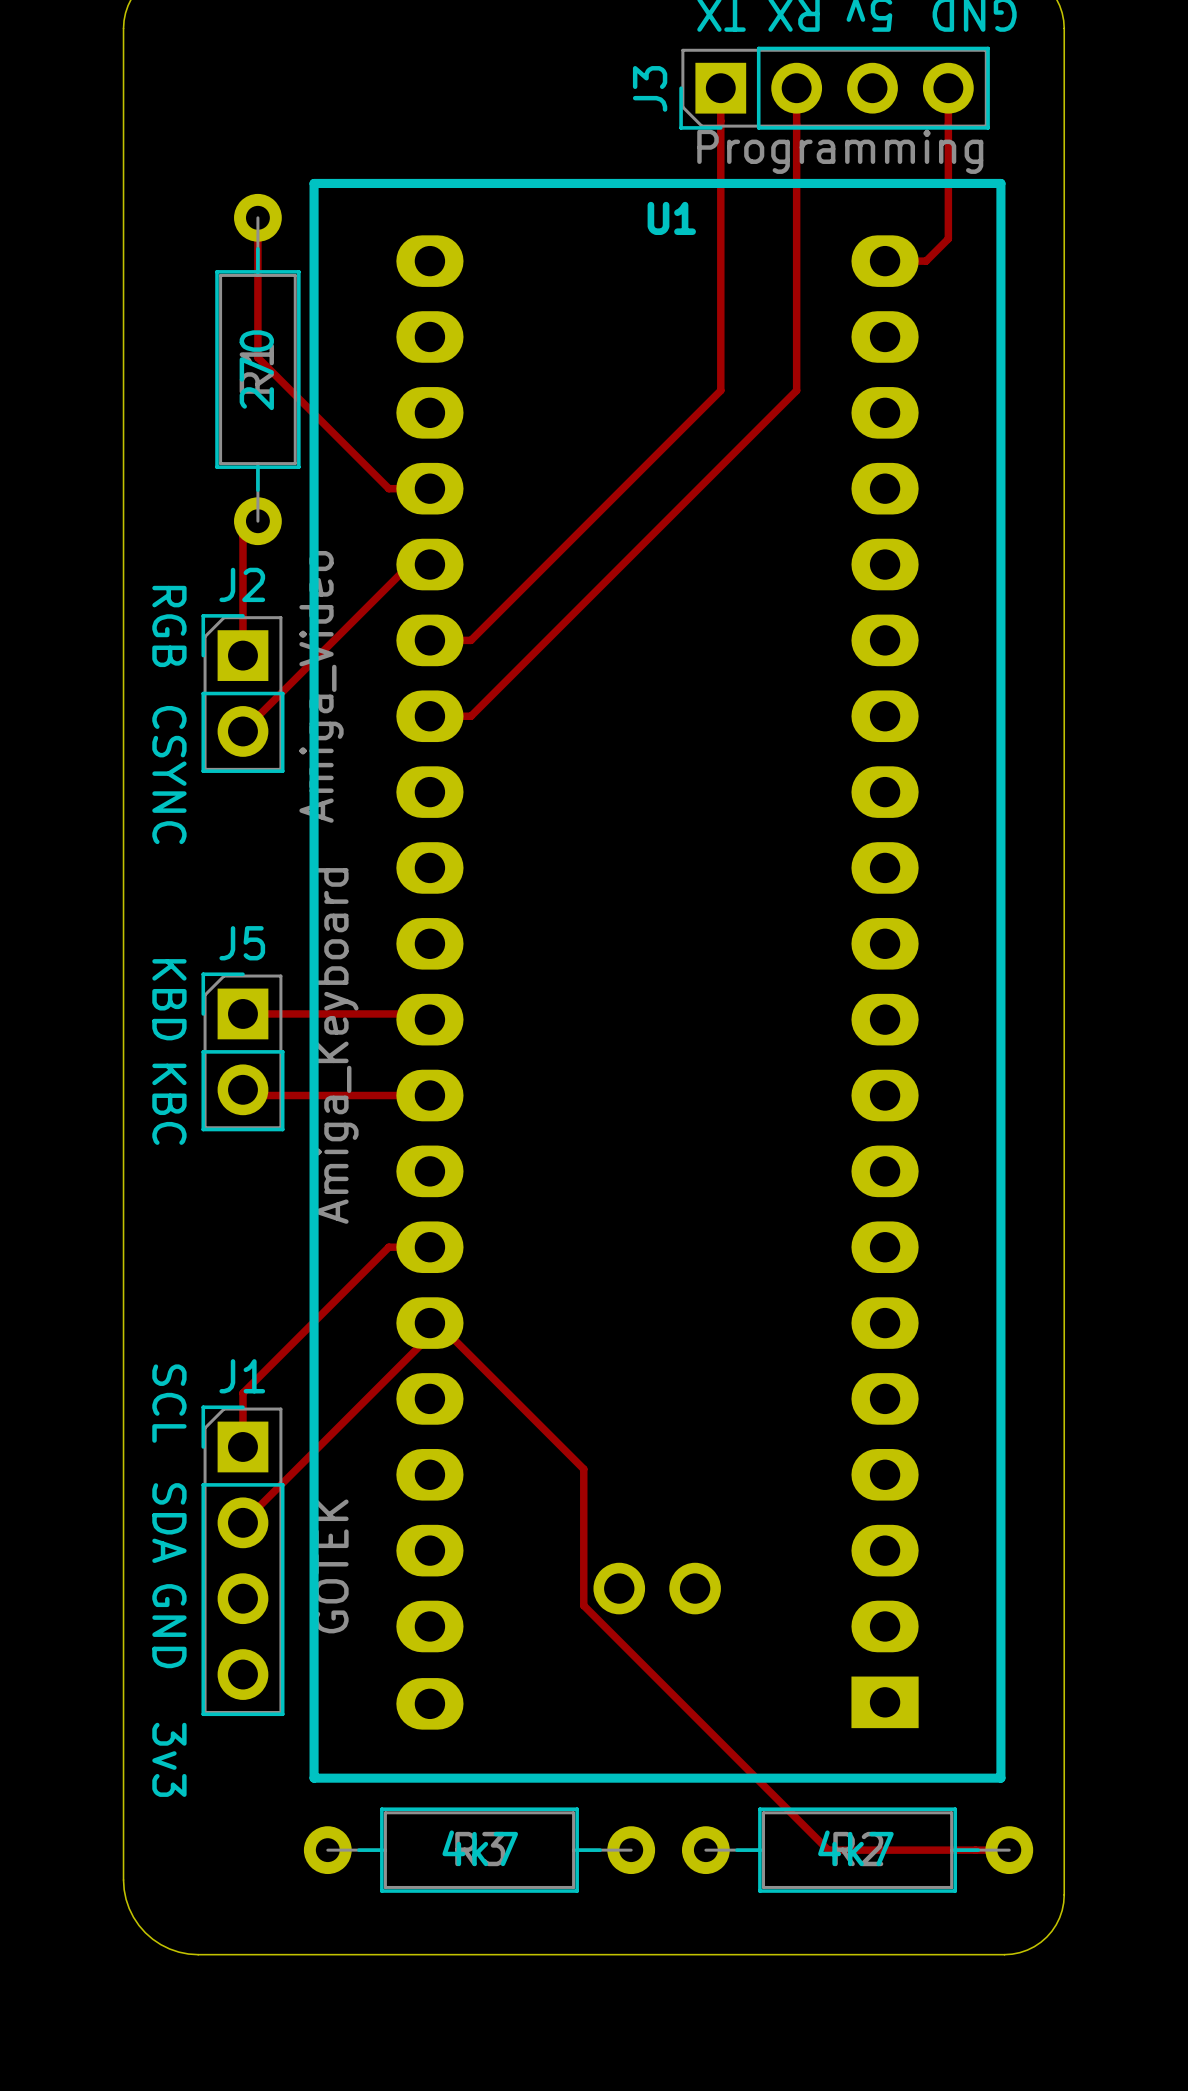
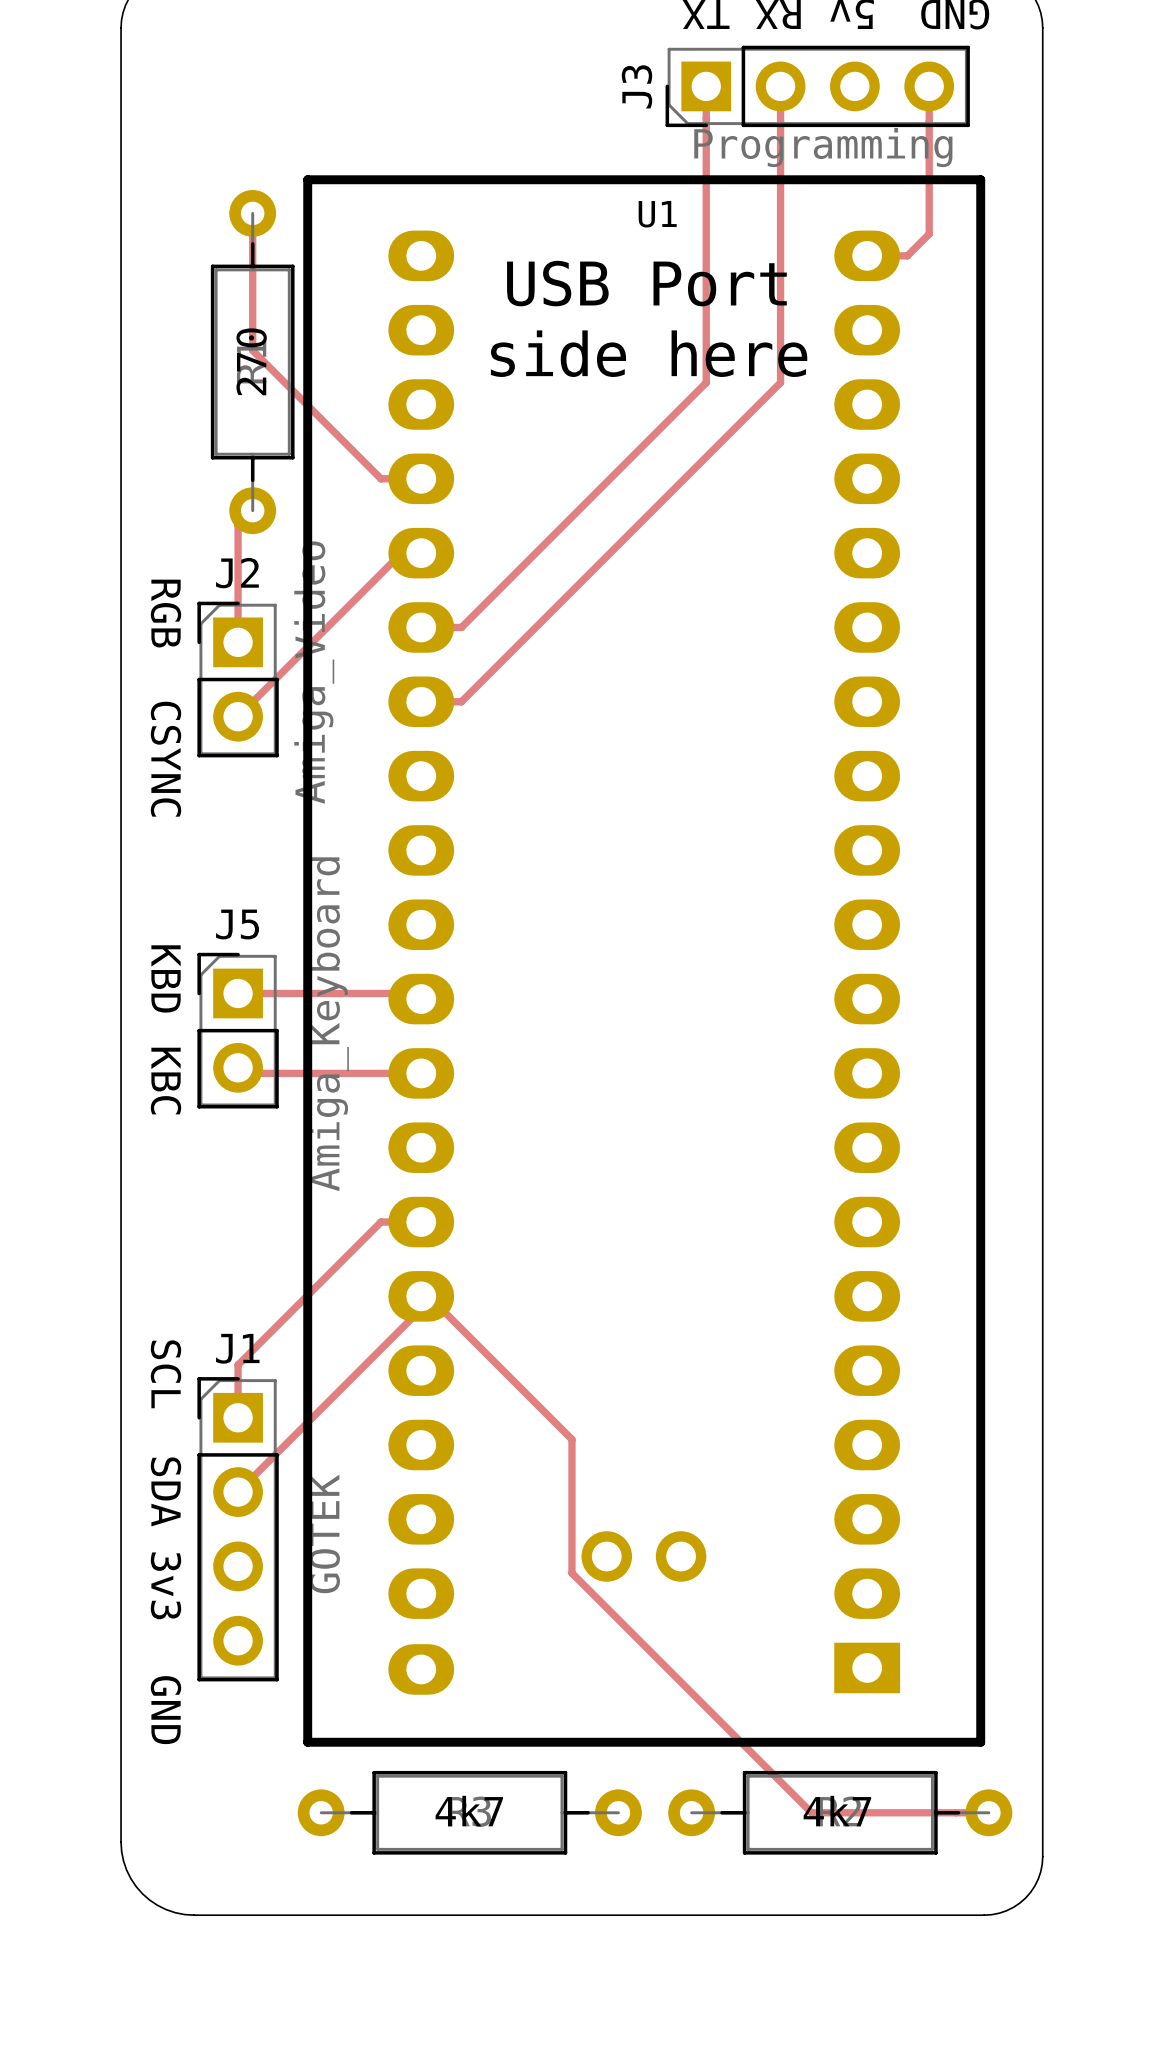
text: none -> USB Port (646, 283)
text: none -> side here (649, 353)
text: GND (169, 1626) -> 3v3 (166, 1585)
text: 3v3 (169, 1759) -> GND (166, 1710)

